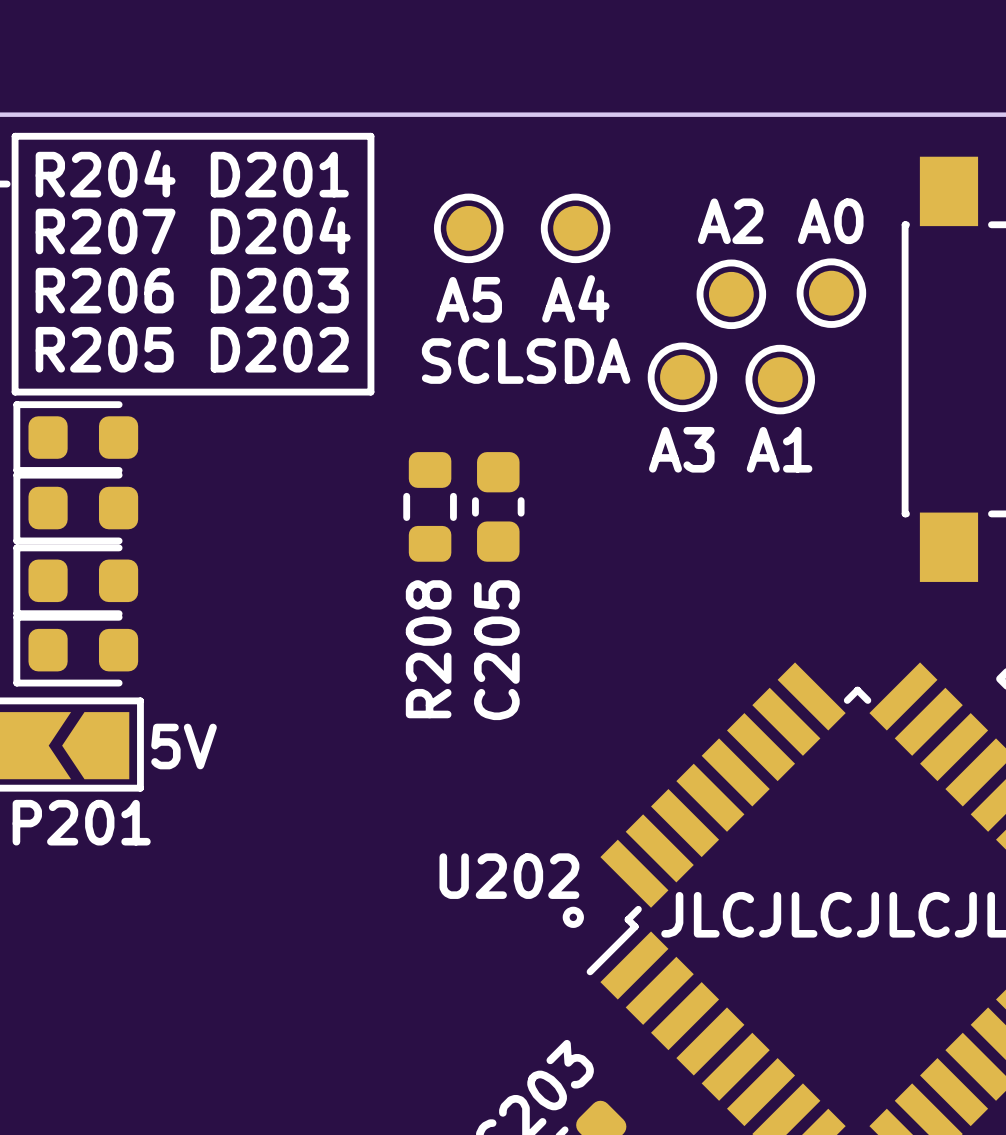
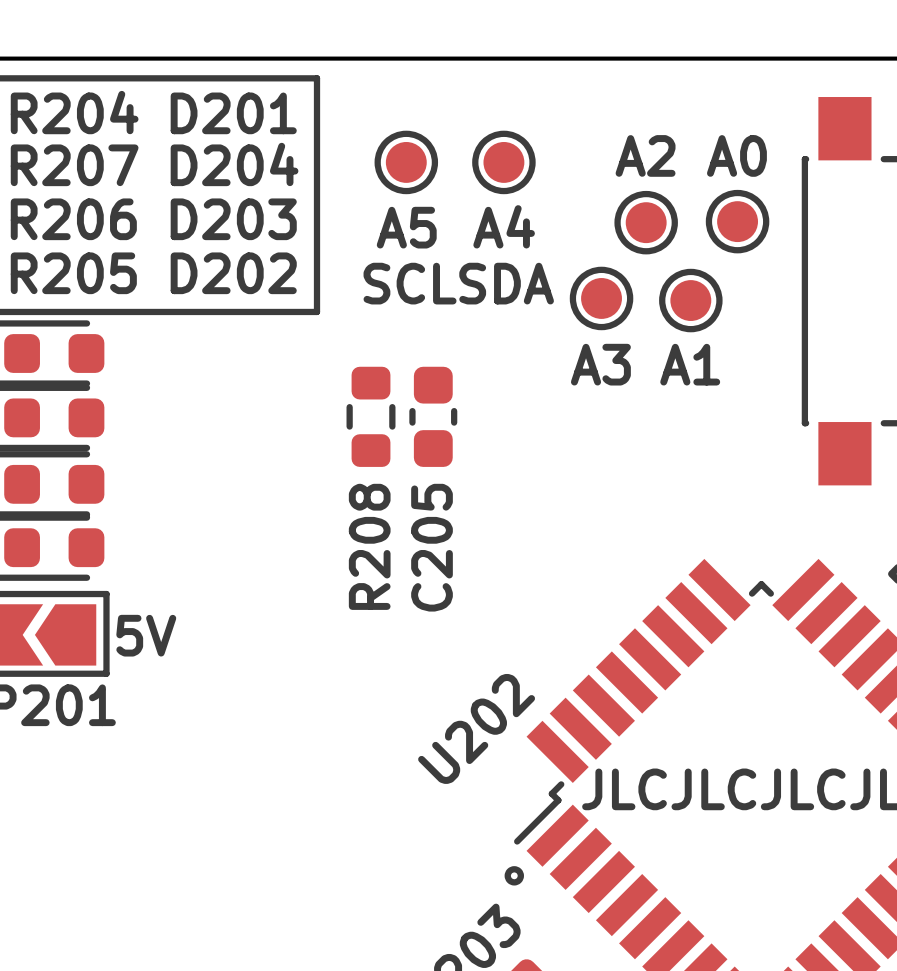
U202 name rotation: 0° (509, 876) -> 45° counterclockwise (476, 728)
drawing position: (573, 917) -> (514, 875)

